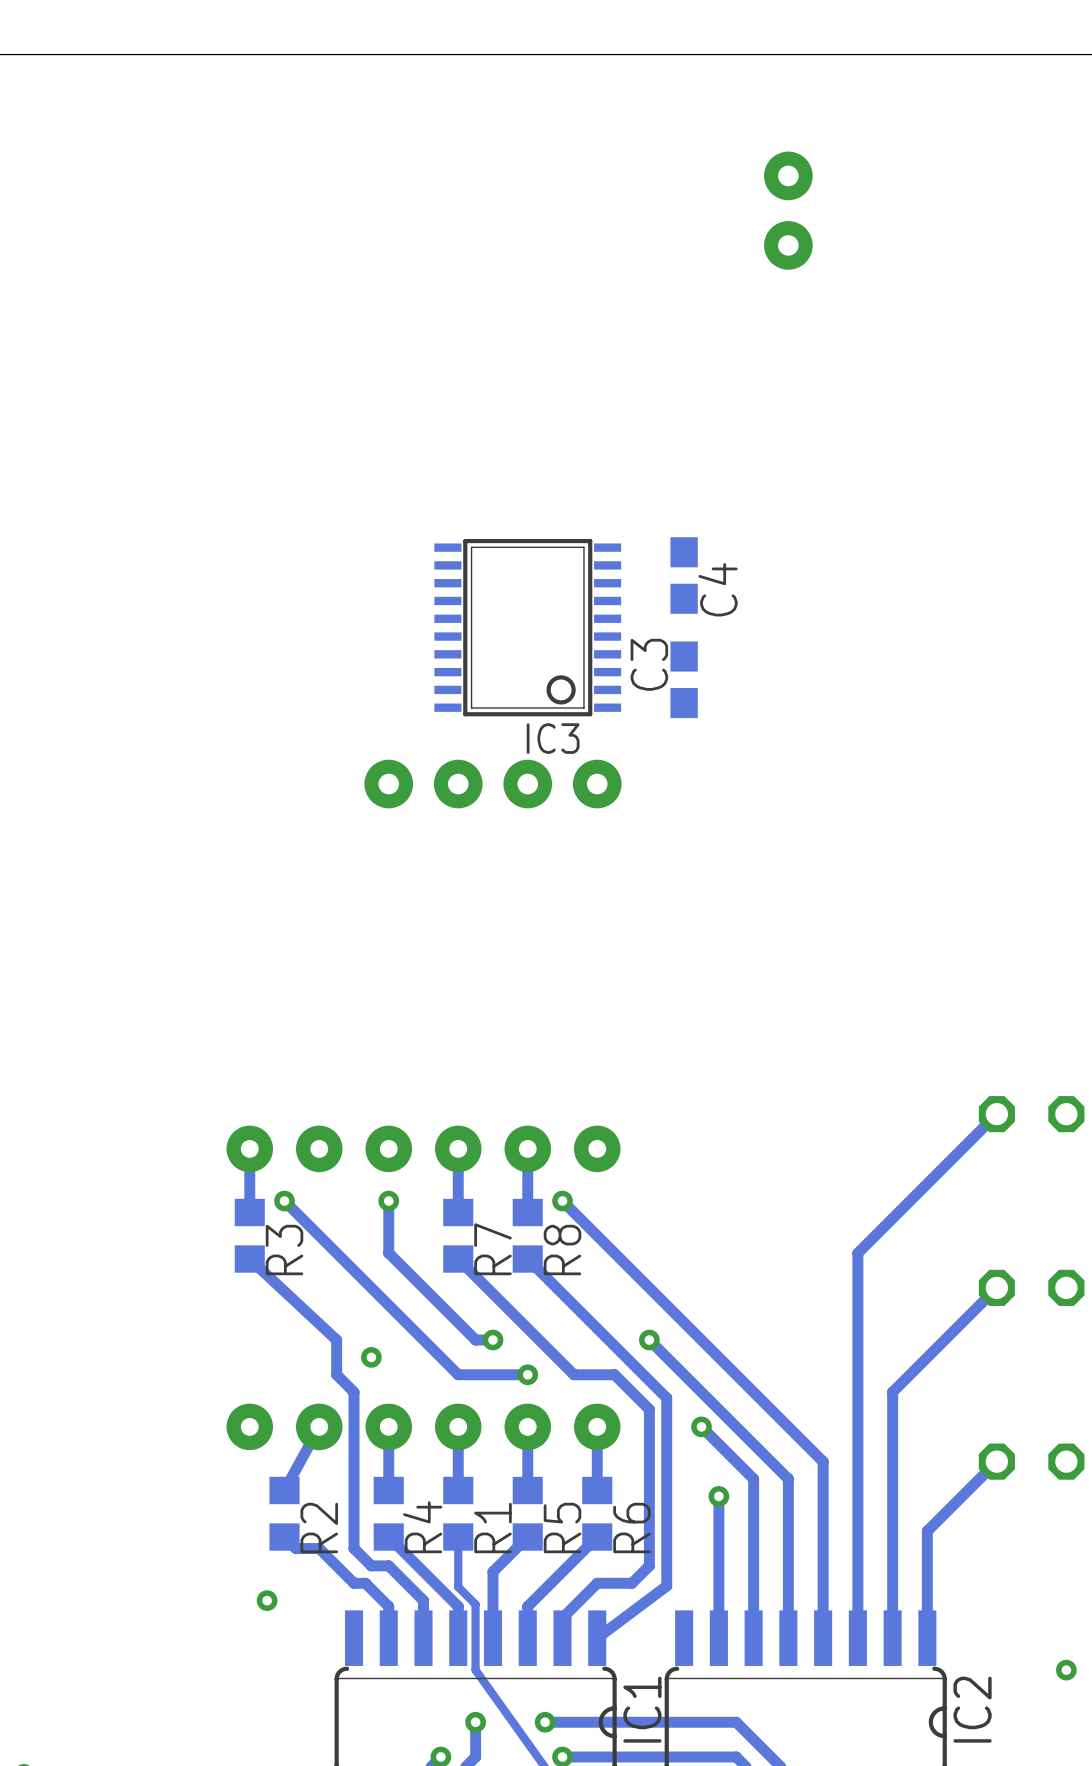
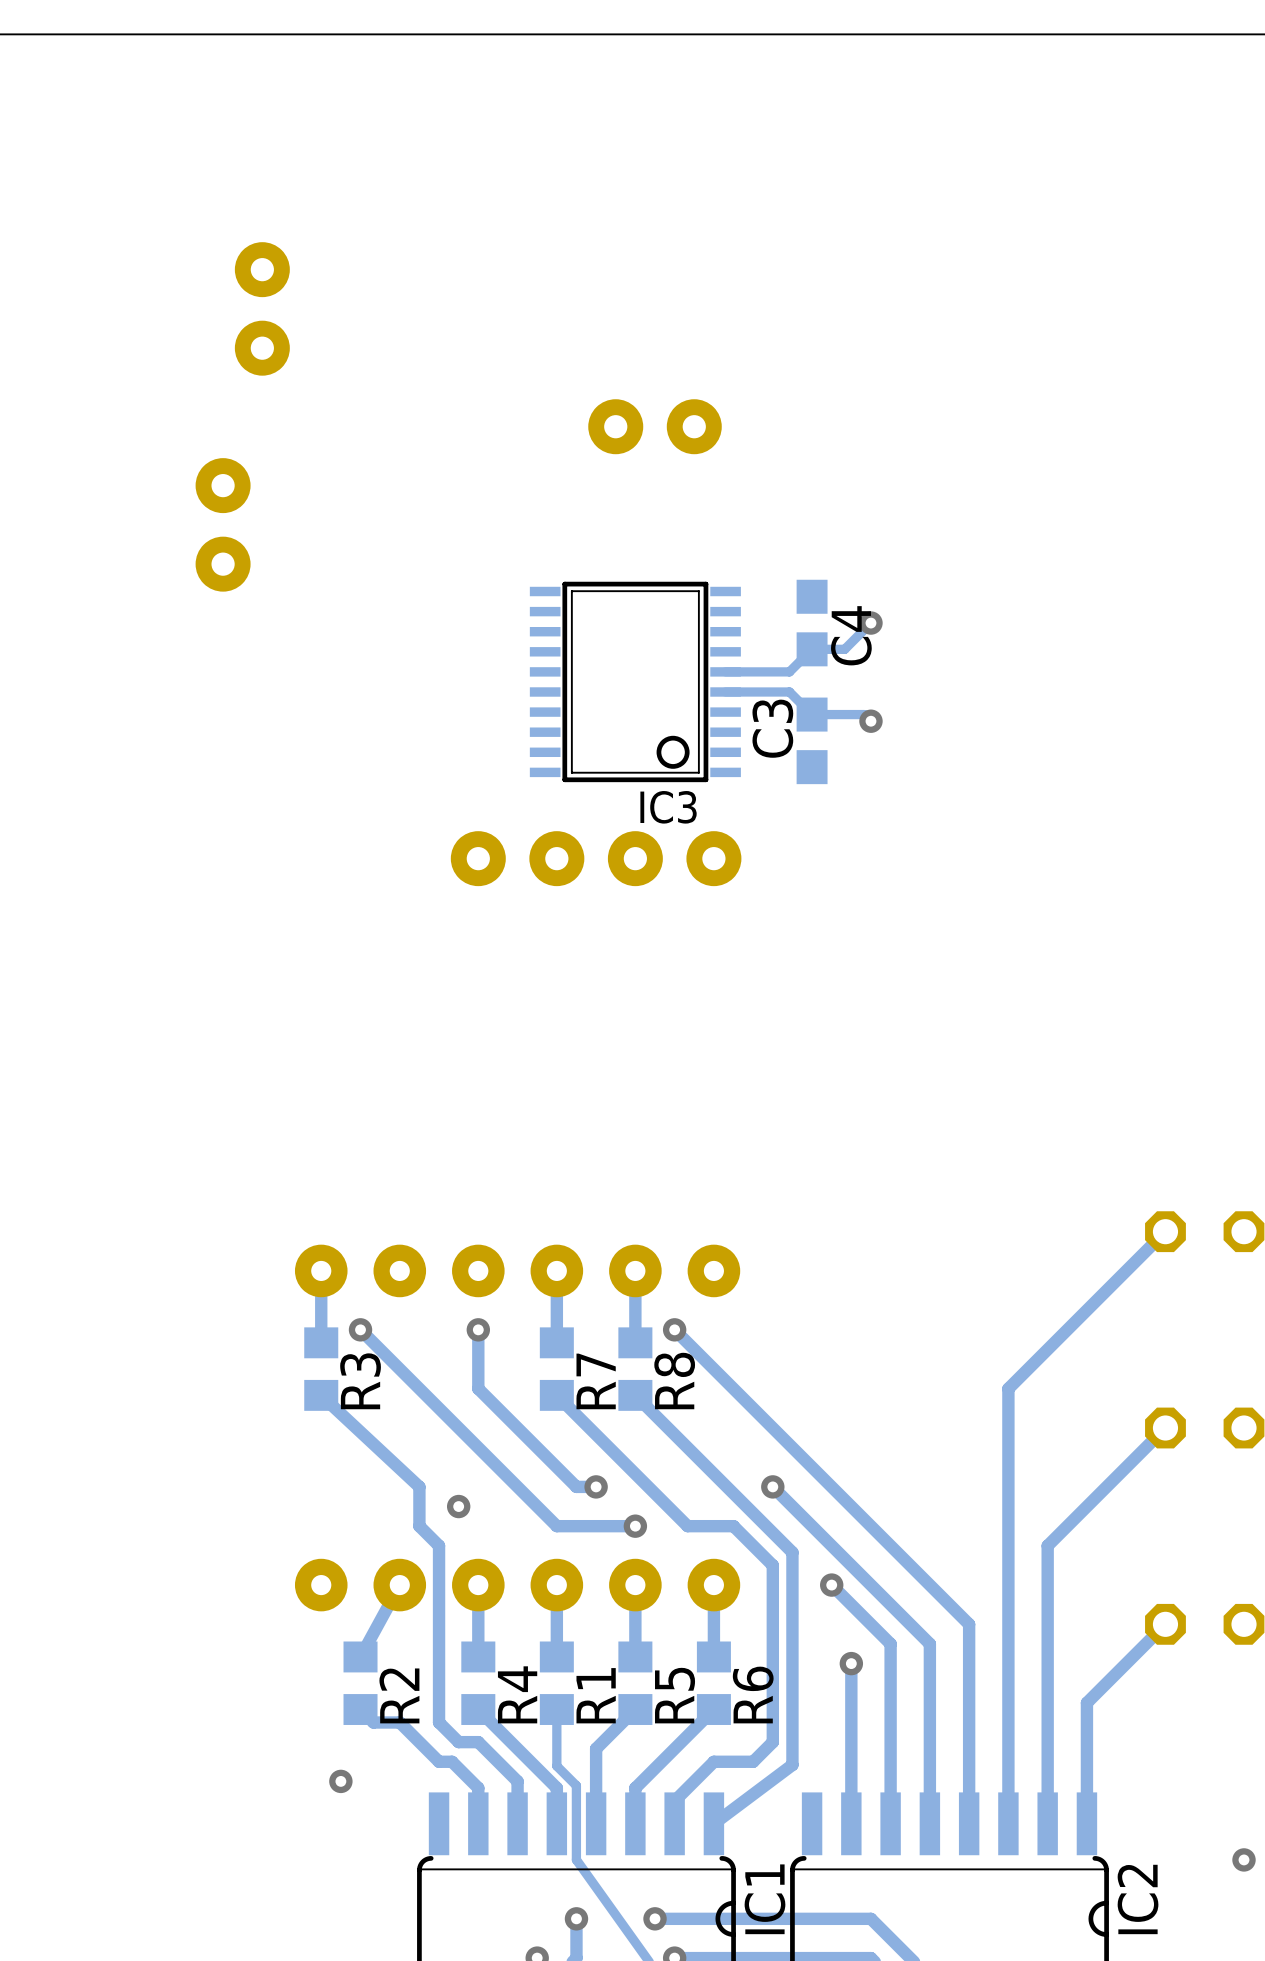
part: (788, 210) -> none
part: none -> (262, 308)
part: none -> (655, 426)
part: none -> (223, 524)
track: none -> (870, 623) (844, 649) (812, 649) (789, 671) (725, 671)
via: none -> (870, 623)
track: none -> (725, 692) (789, 692) (812, 714) (864, 714) (870, 721)
via: none -> (870, 721)

